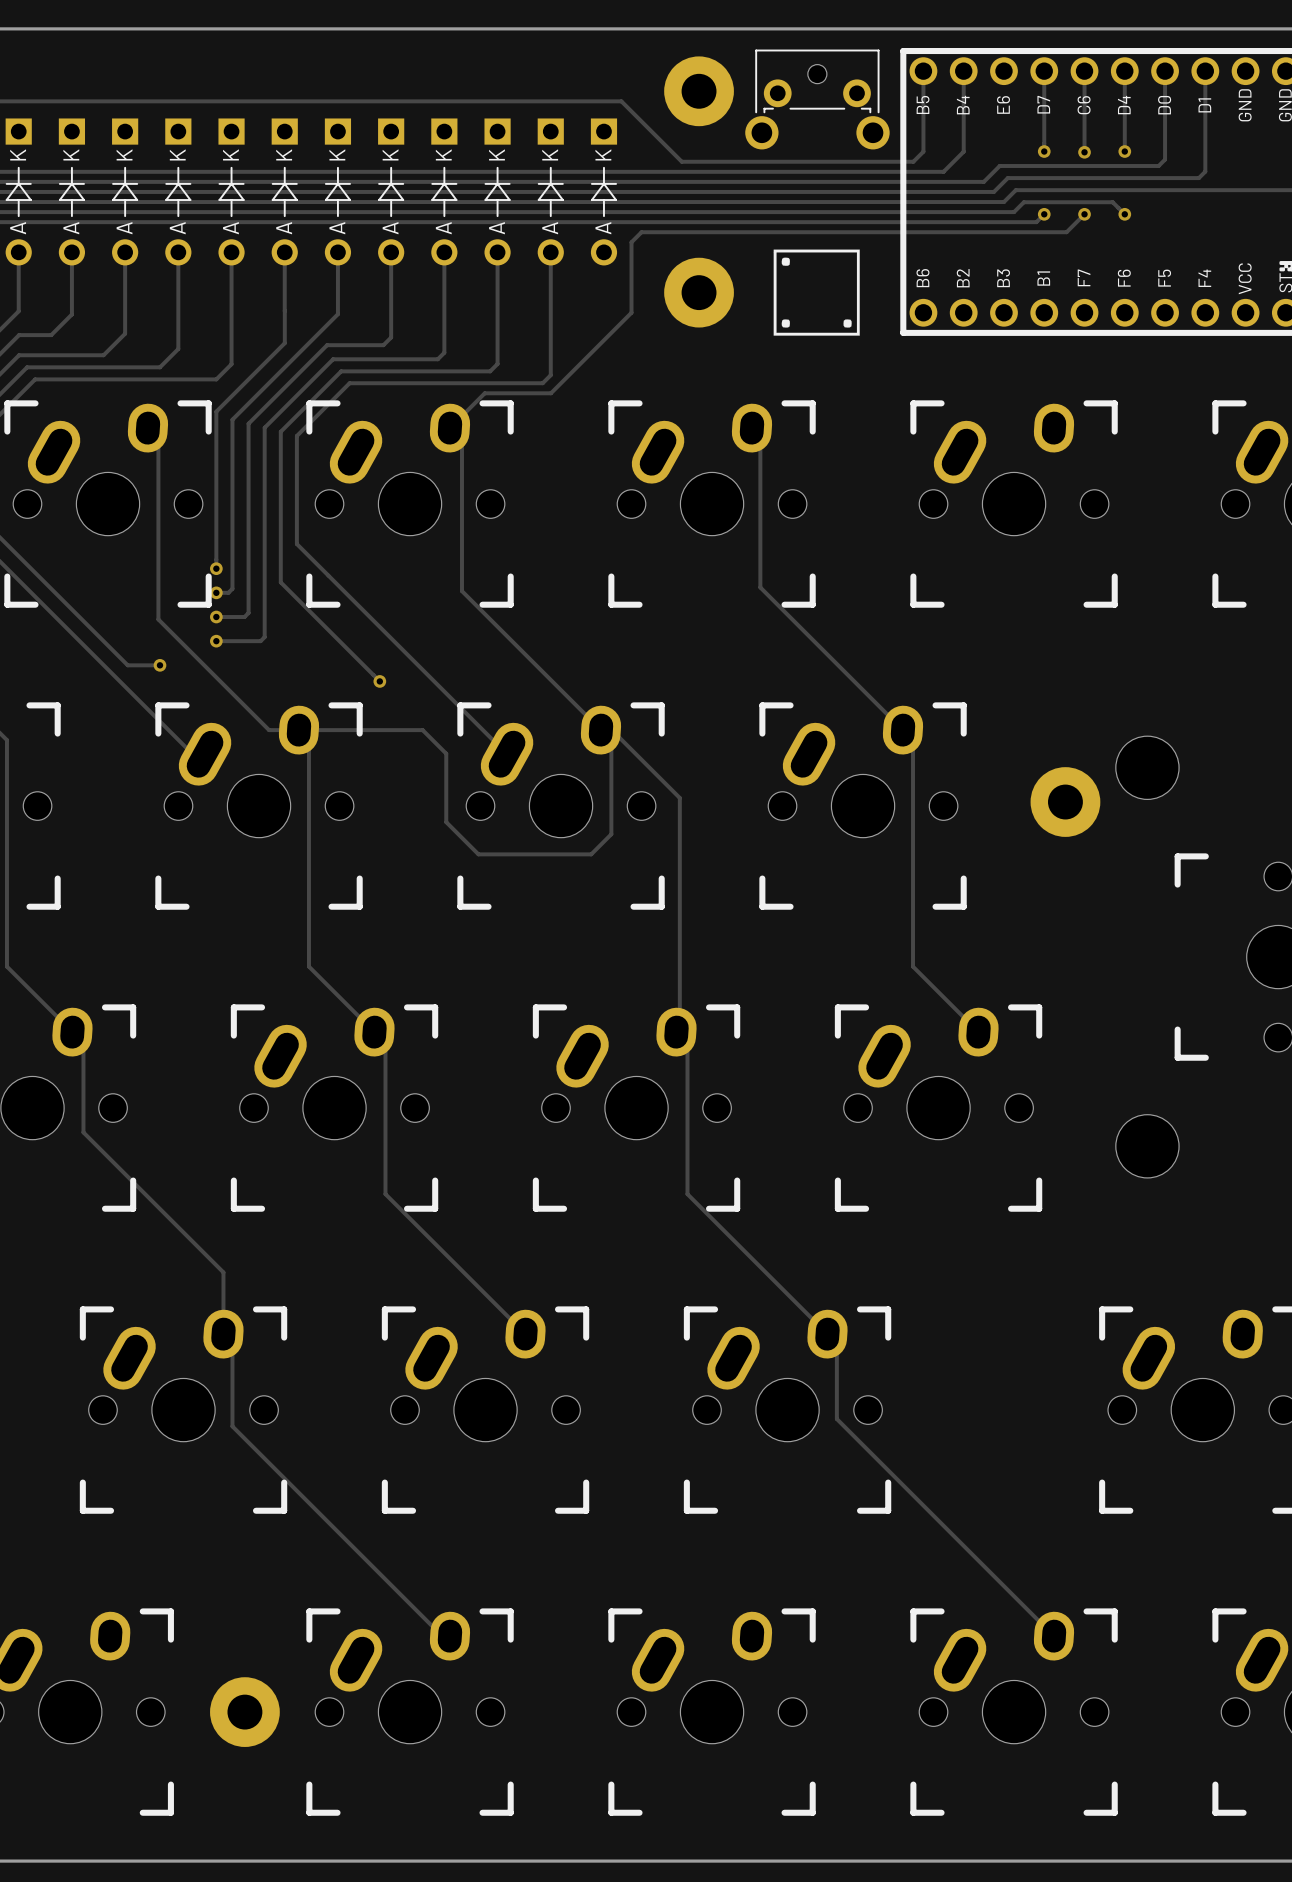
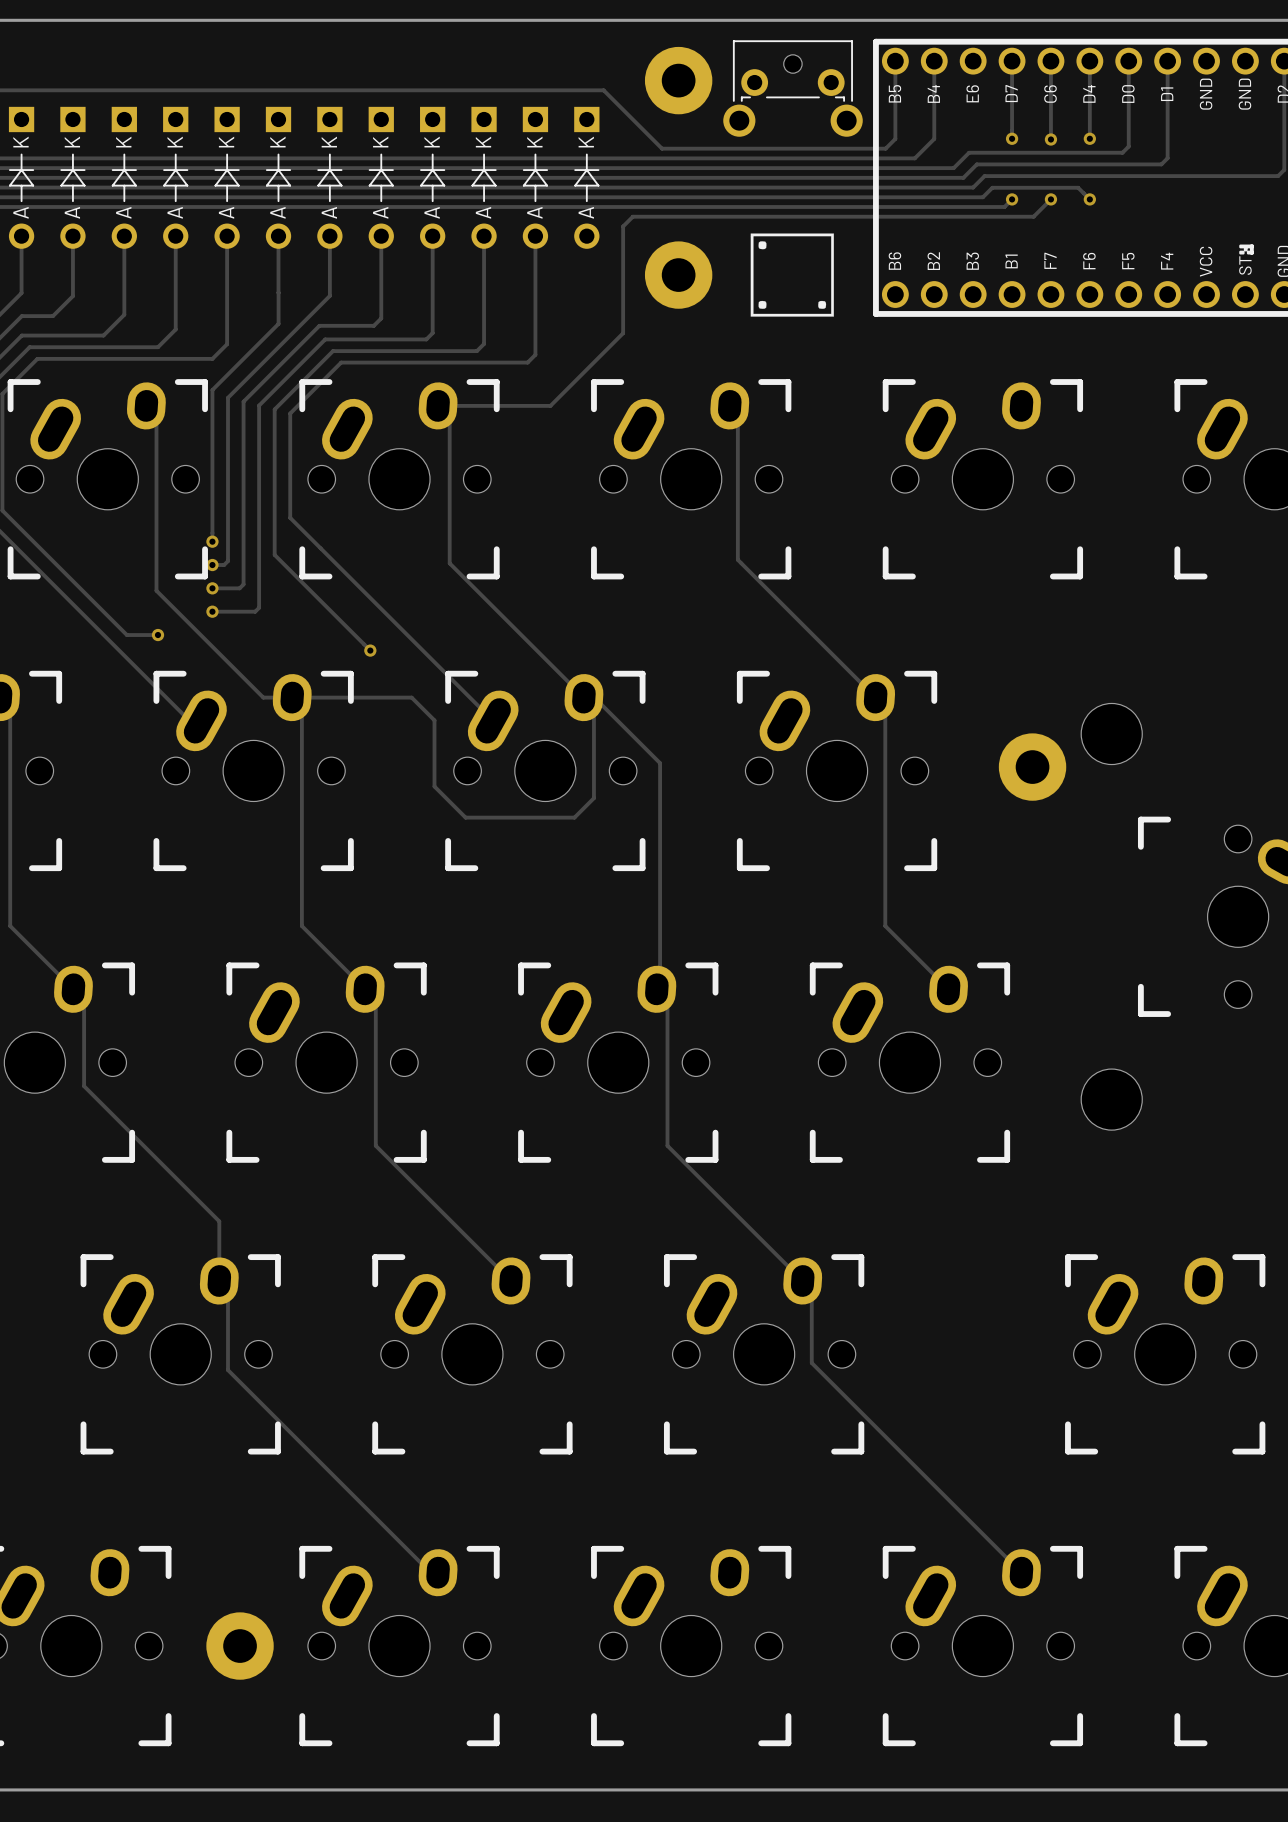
track: (651, 232) (641, 232) (631, 242) (631, 312) (550, 393) (484, 393) (449, 428) -> (632, 216) (623, 226) (623, 333) (550, 405) (438, 405)

